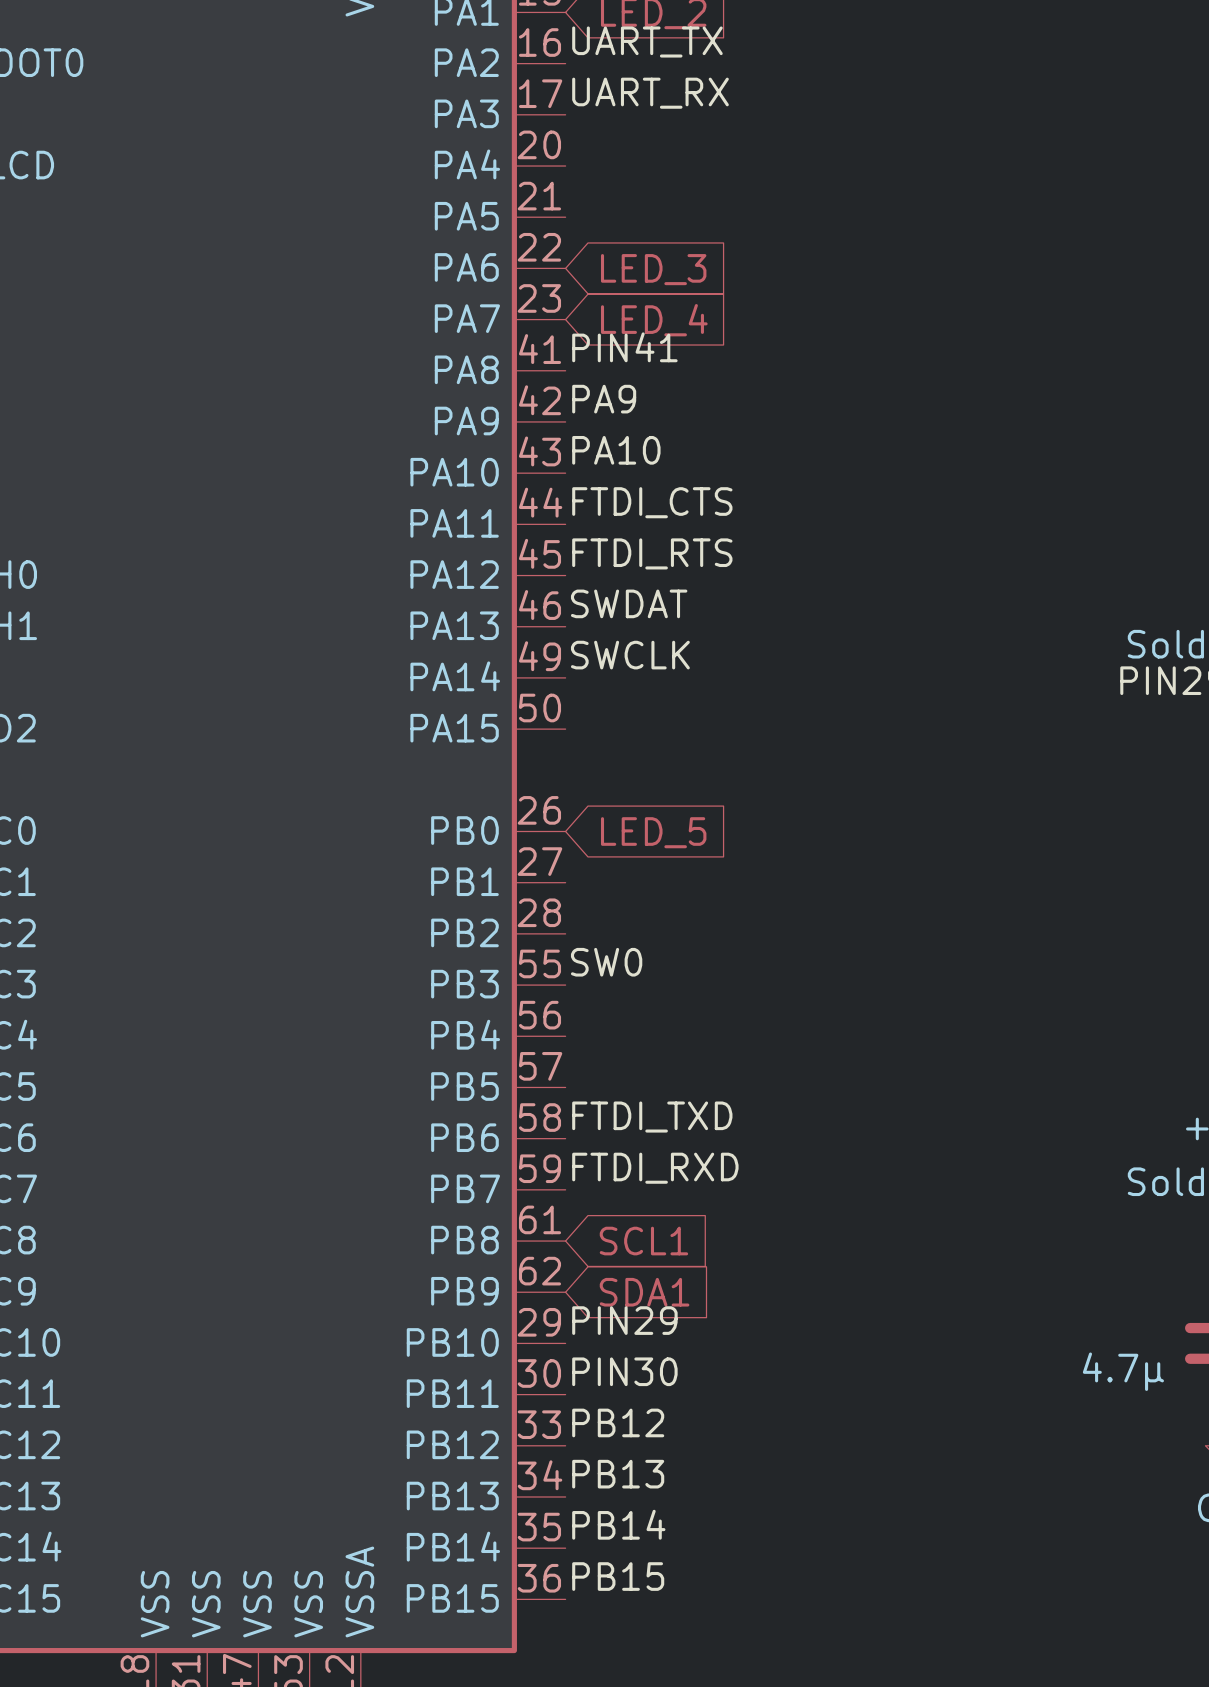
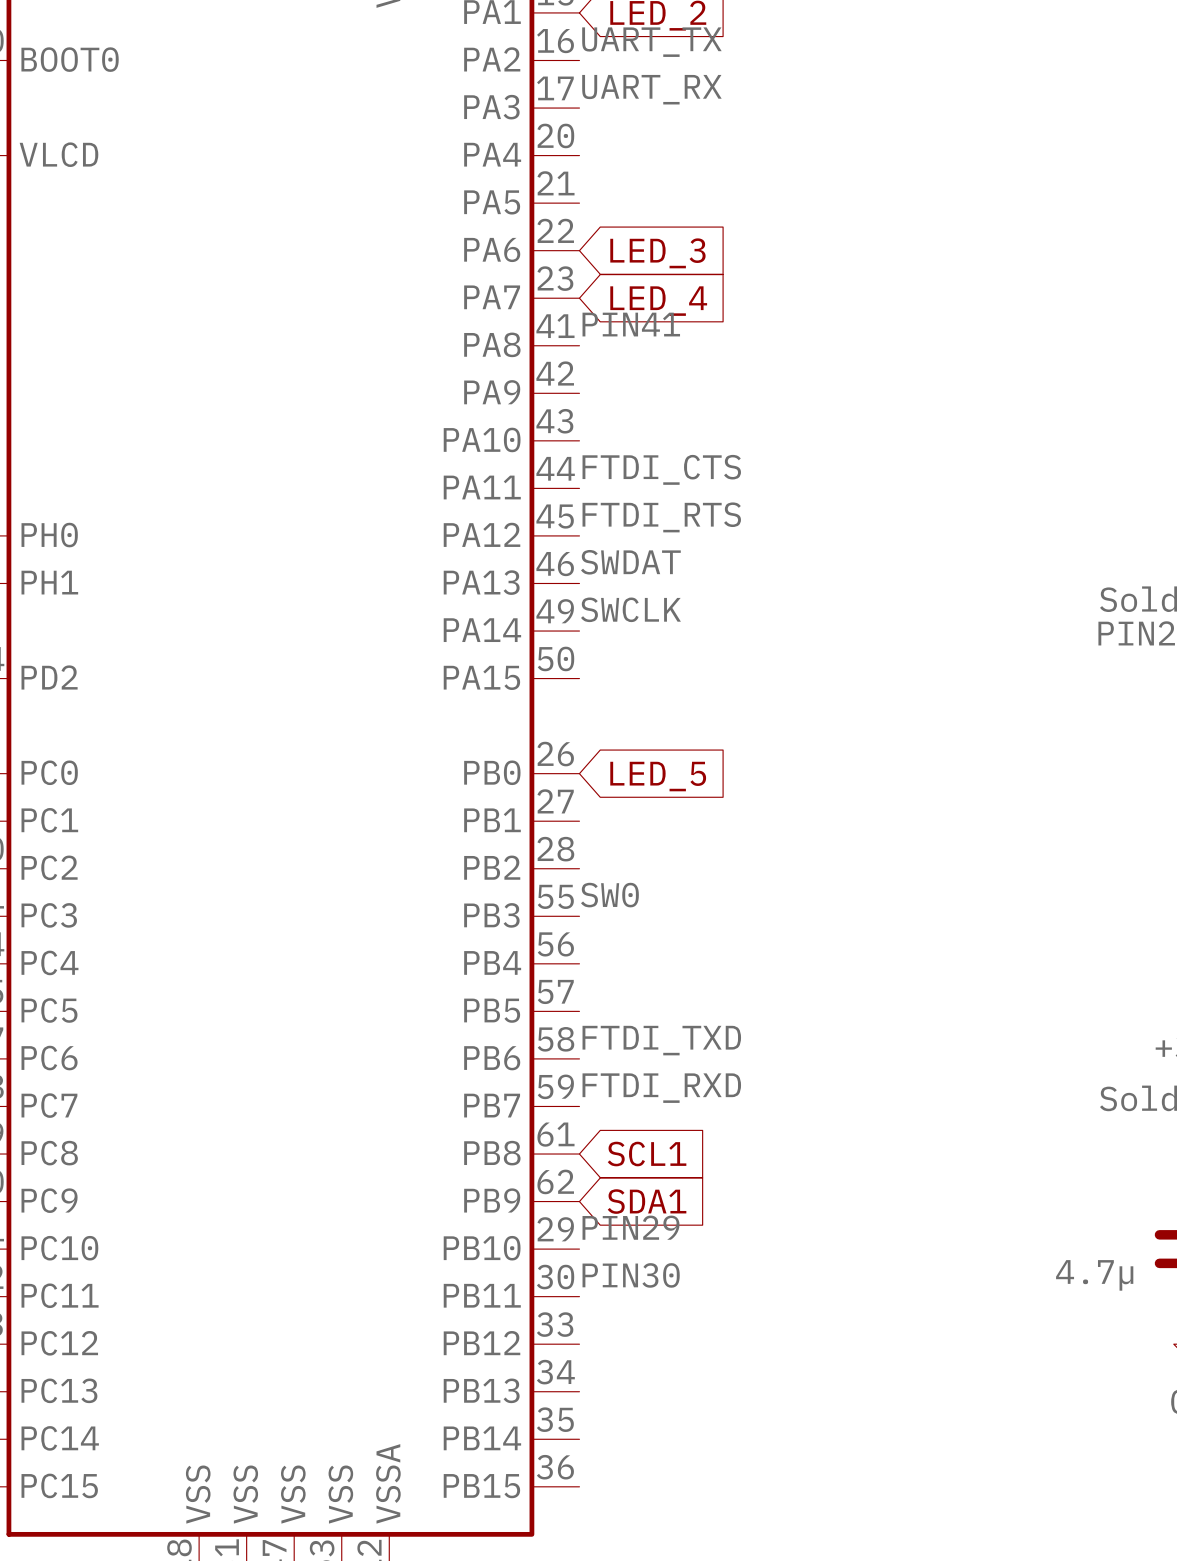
label: PA9 (604, 399) -> none
label: PA10 (616, 450) -> none
label: PB12 (618, 1422) -> none
label: PB13 (618, 1474) -> none
label: PB14 (618, 1524) -> none
label: PB15 (618, 1576) -> none

